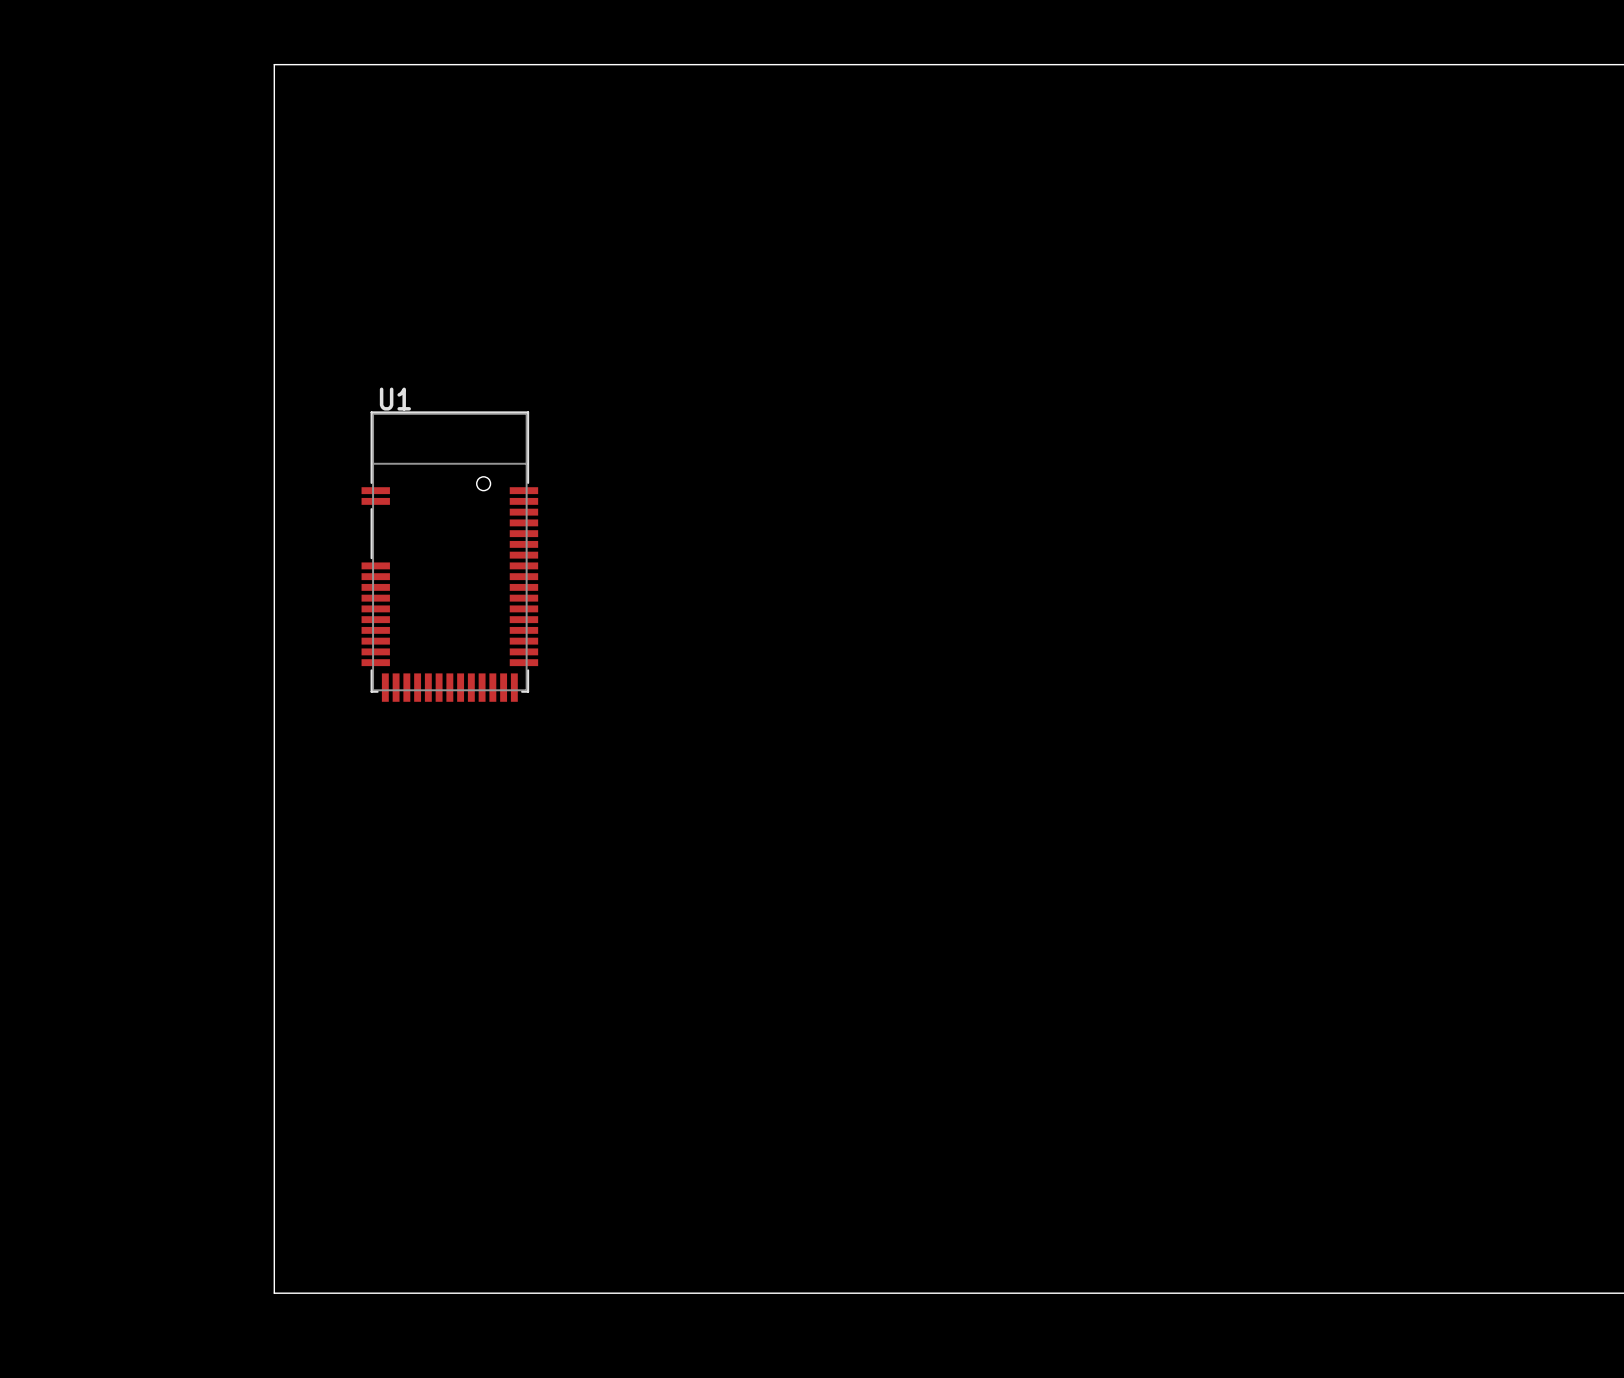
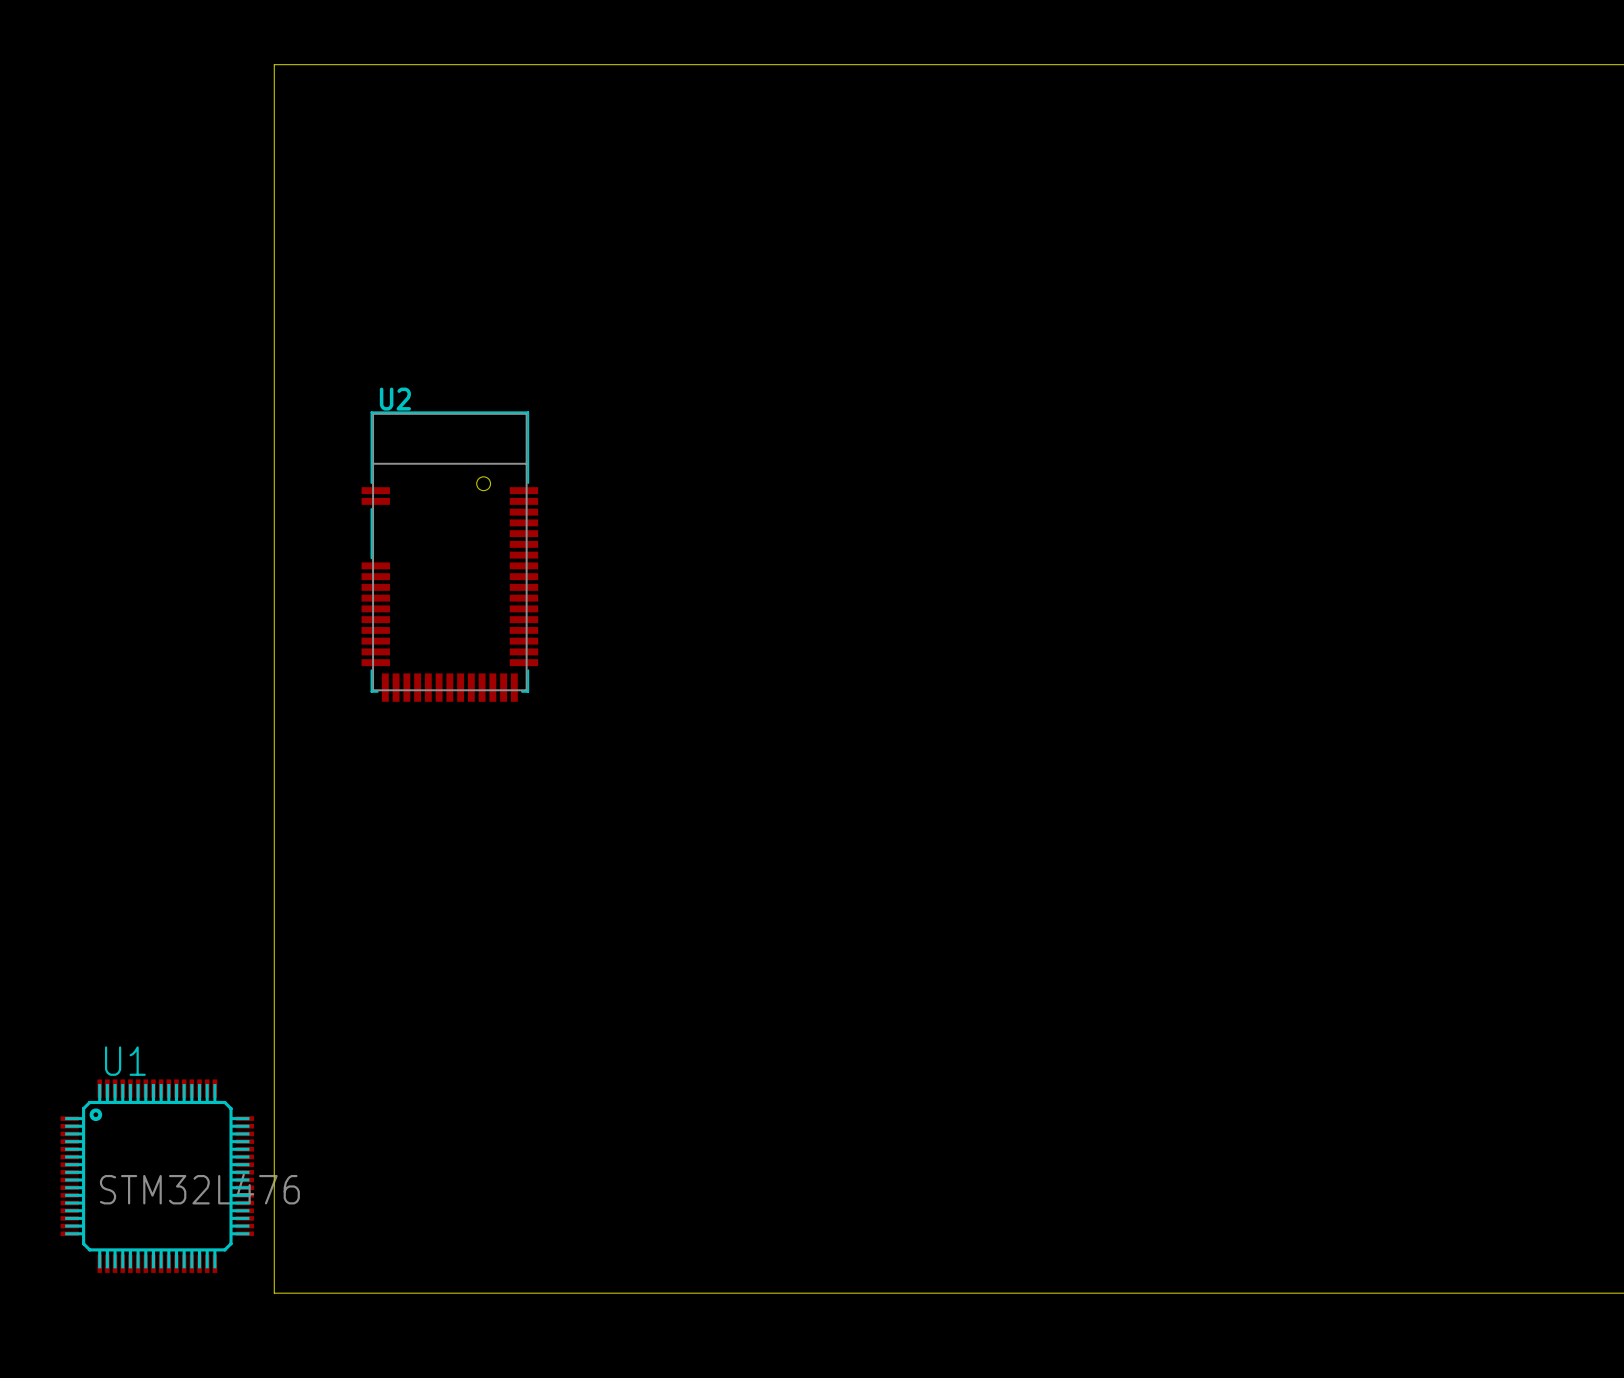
U1 name: U1 (395, 399) -> U2 (395, 399)
U1: none -> STM32L476 (157, 1176)

